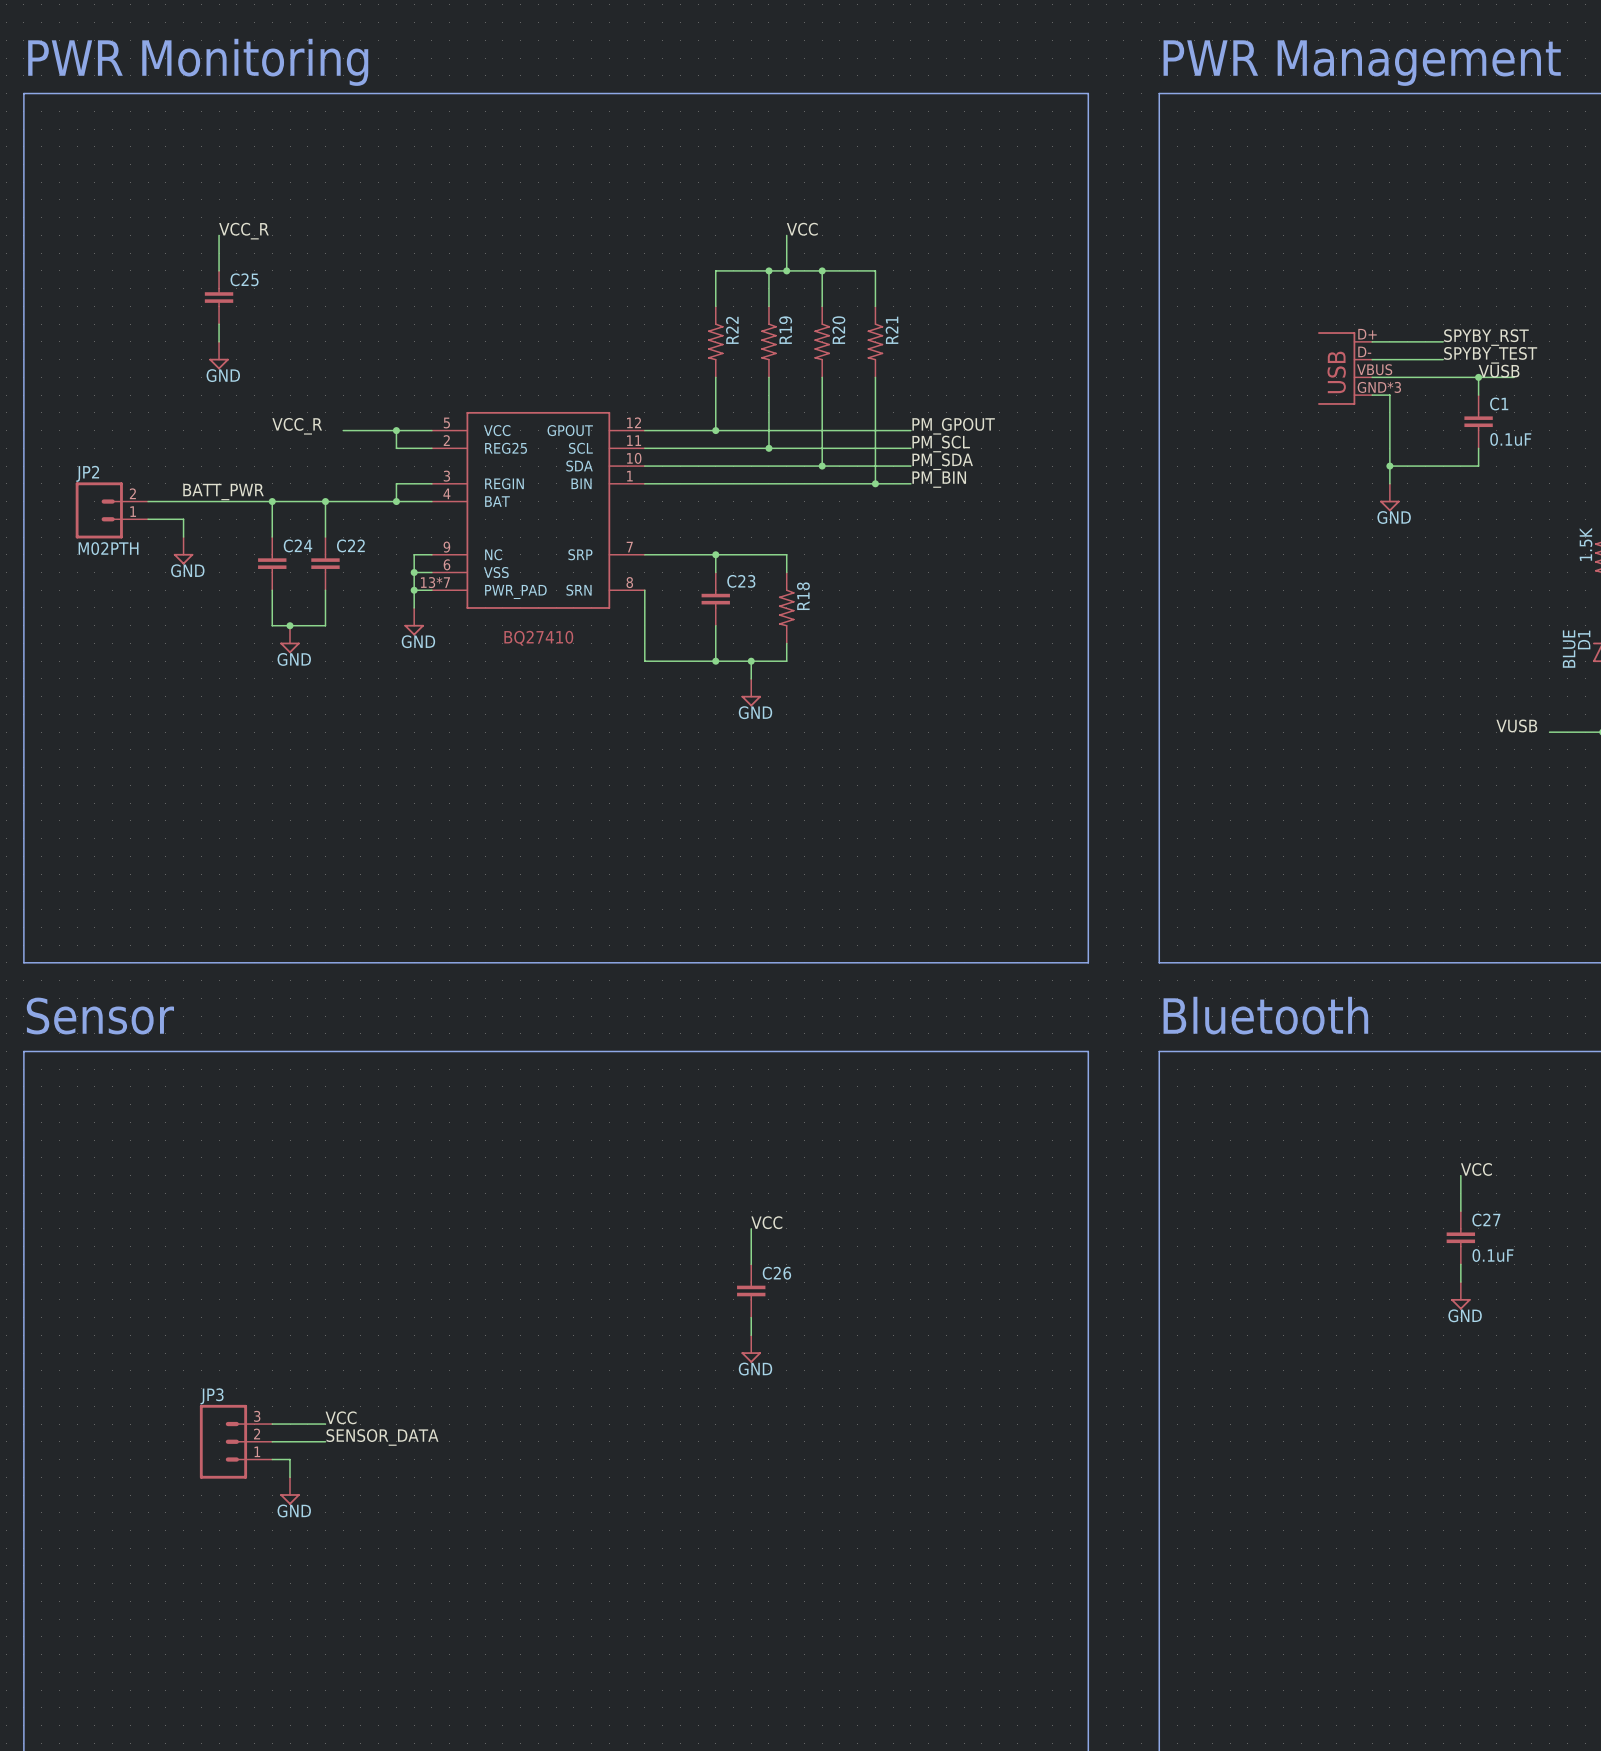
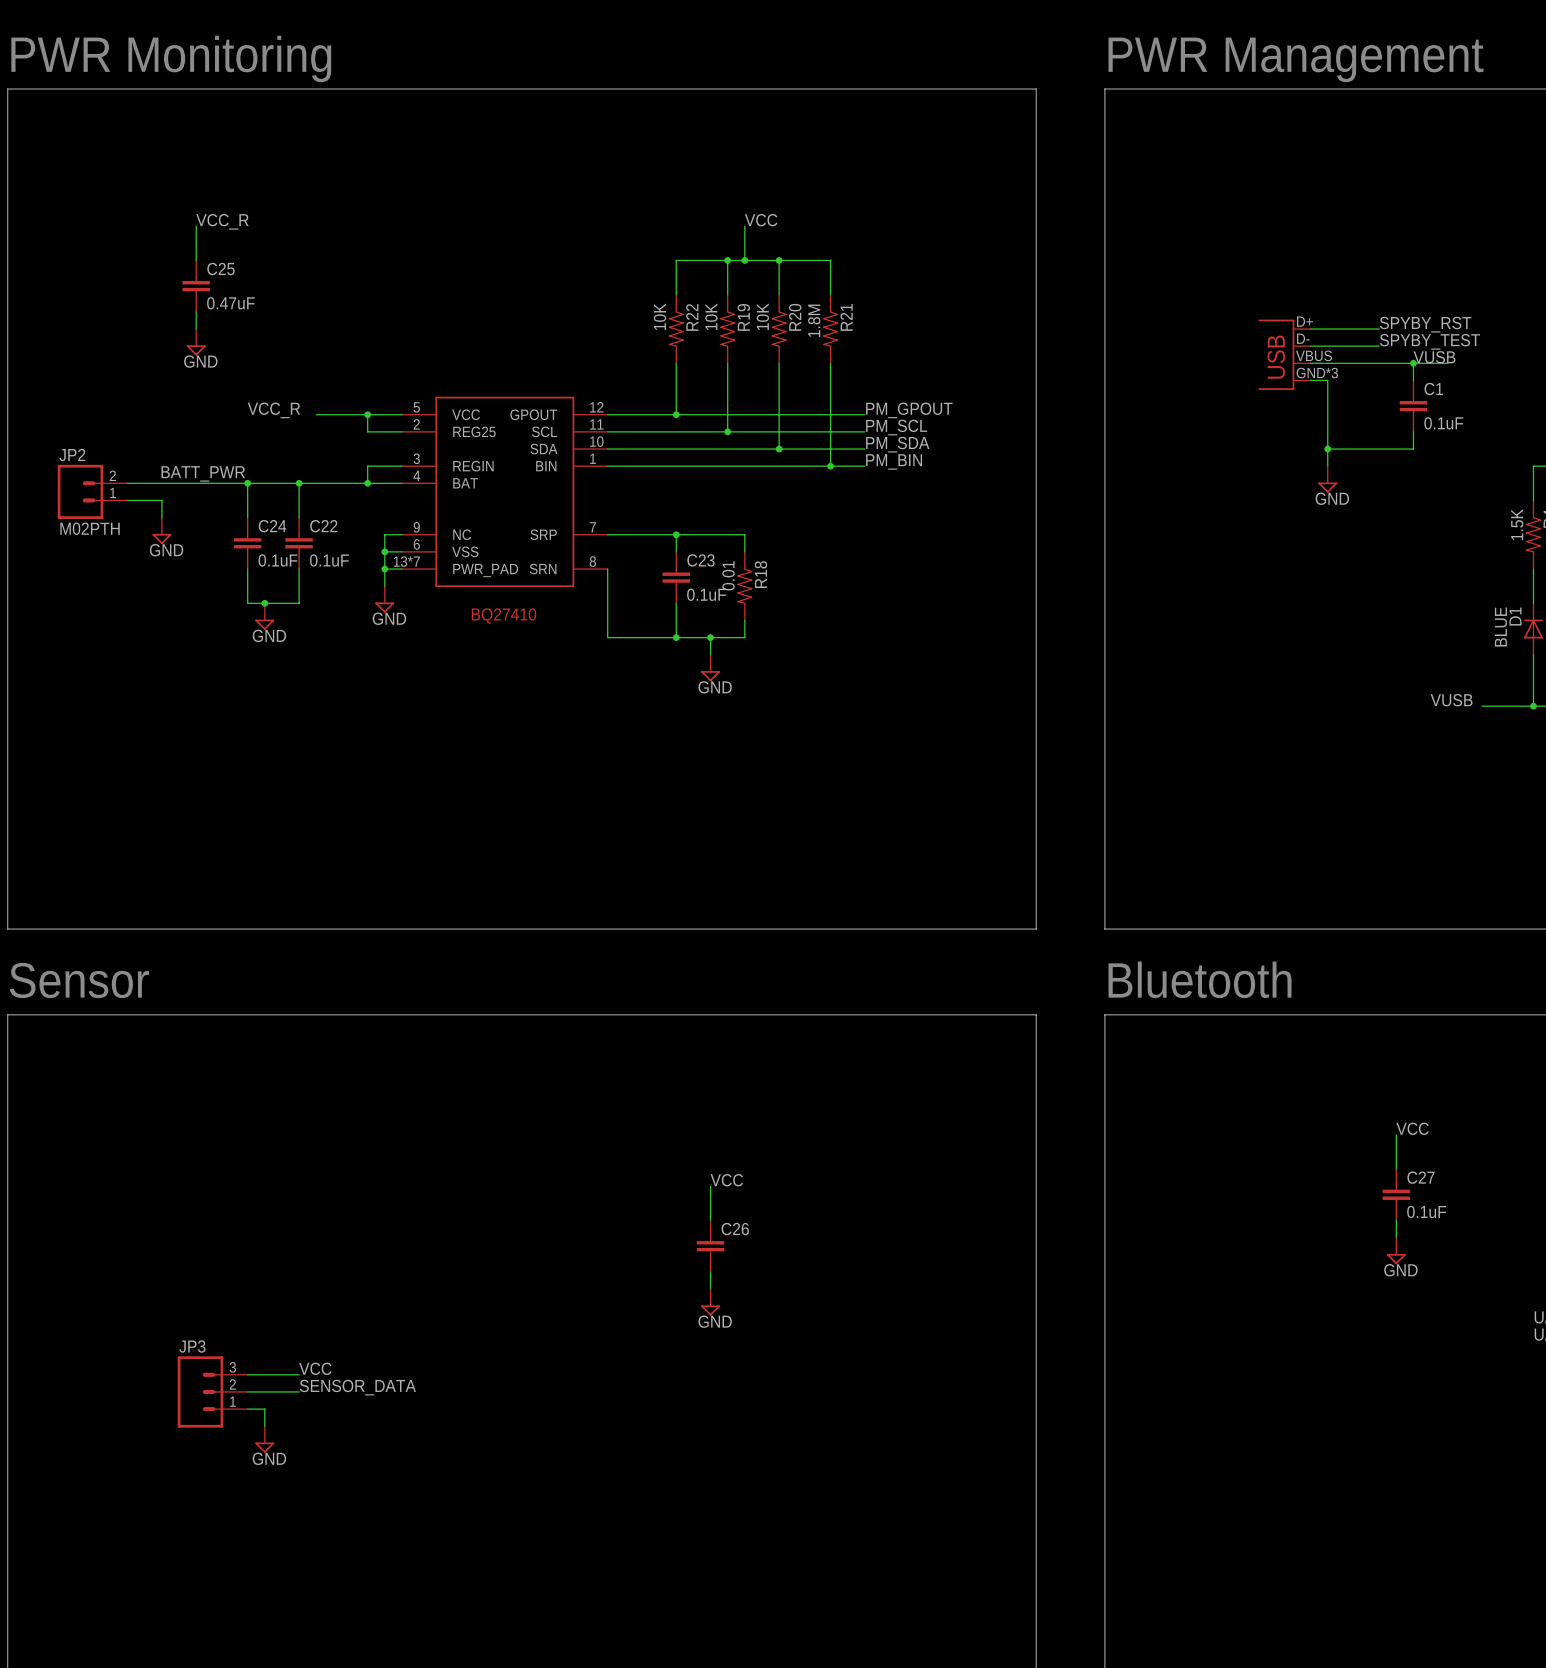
C25 value: none -> 0.47uF (230, 303)
R22 value: none -> 10K (659, 316)
R19 value: none -> 10K (711, 316)
R20 value: none -> 10K (762, 316)
R21 value: none -> 1.8M (814, 320)
C24 value: none -> 0.1uF (278, 560)
C22 value: none -> 0.1uF (329, 560)
R18 value: none -> 0.01 (728, 575)
C23 value: none -> 0.1uF (706, 594)

